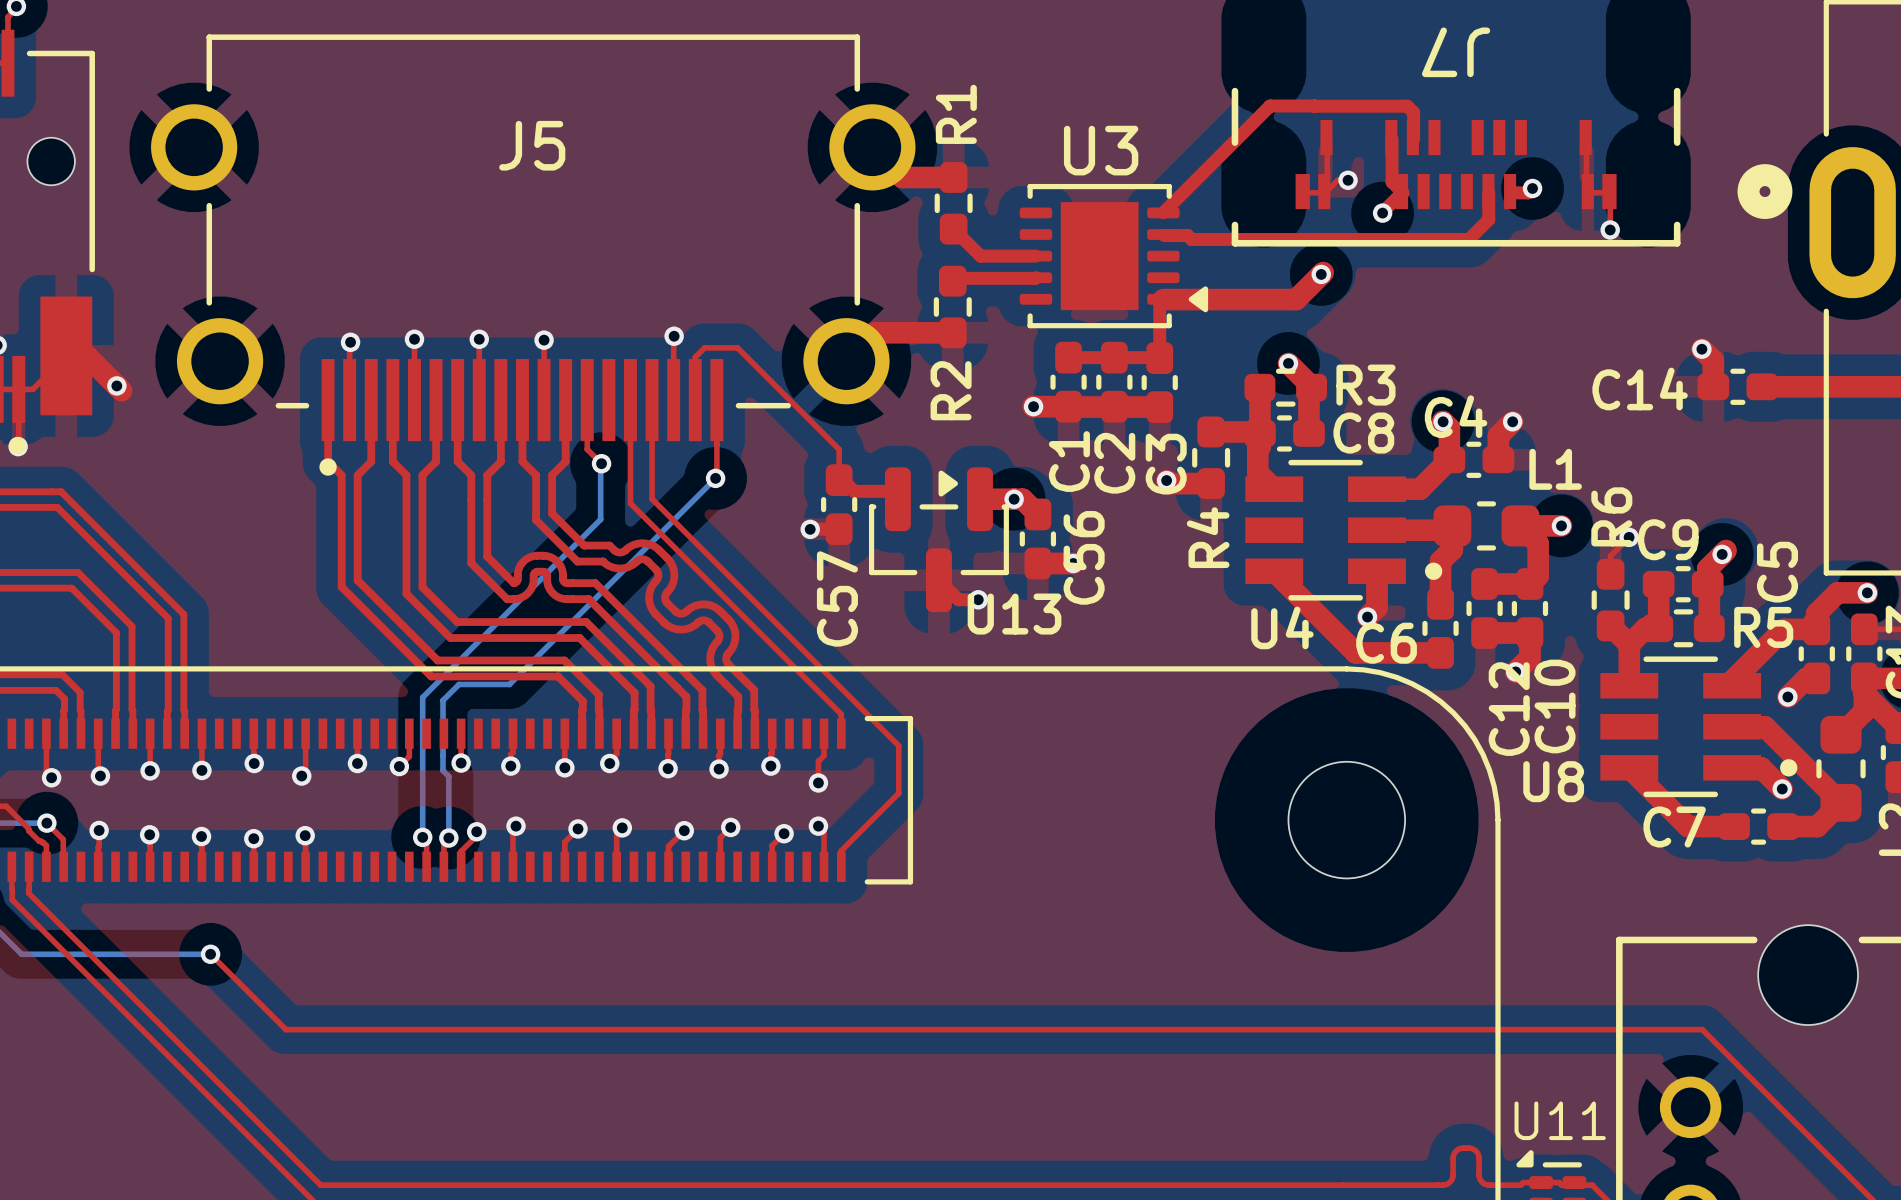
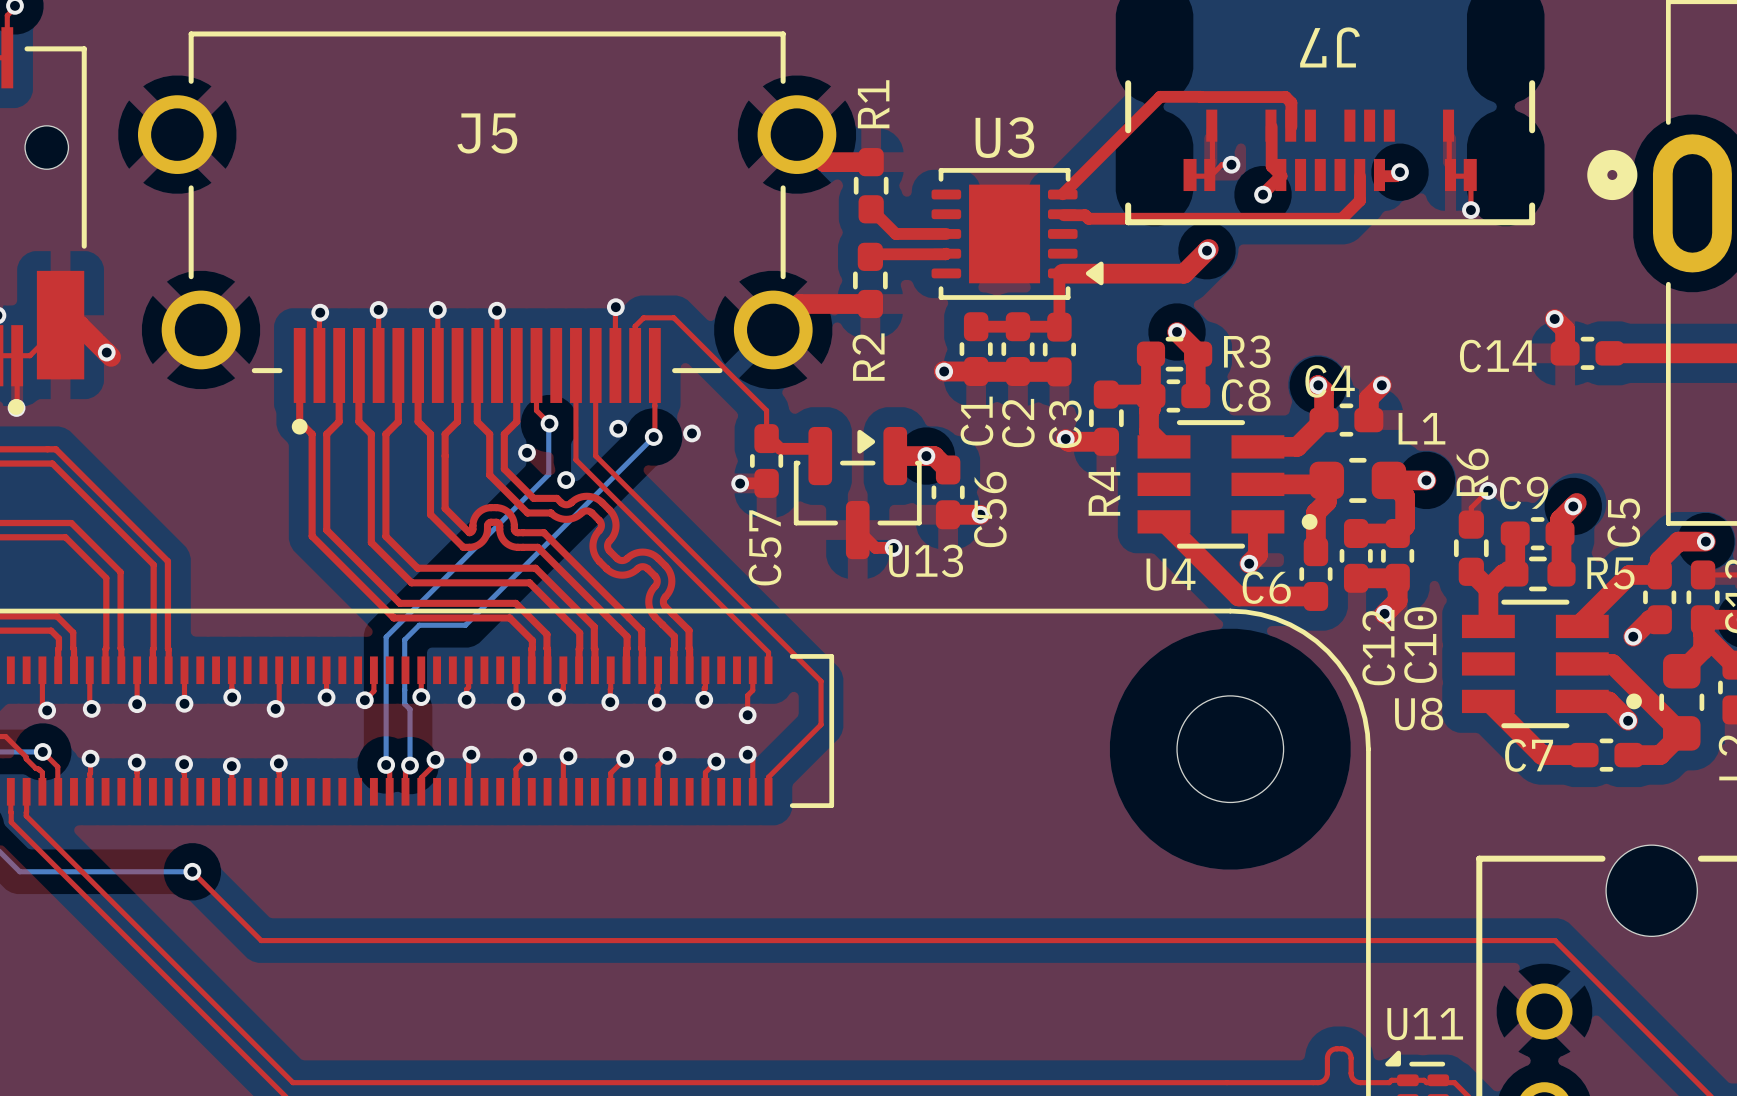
via: none -> (618, 428)
via: none -> (692, 433)
via: none -> (527, 452)
via: none -> (566, 480)

